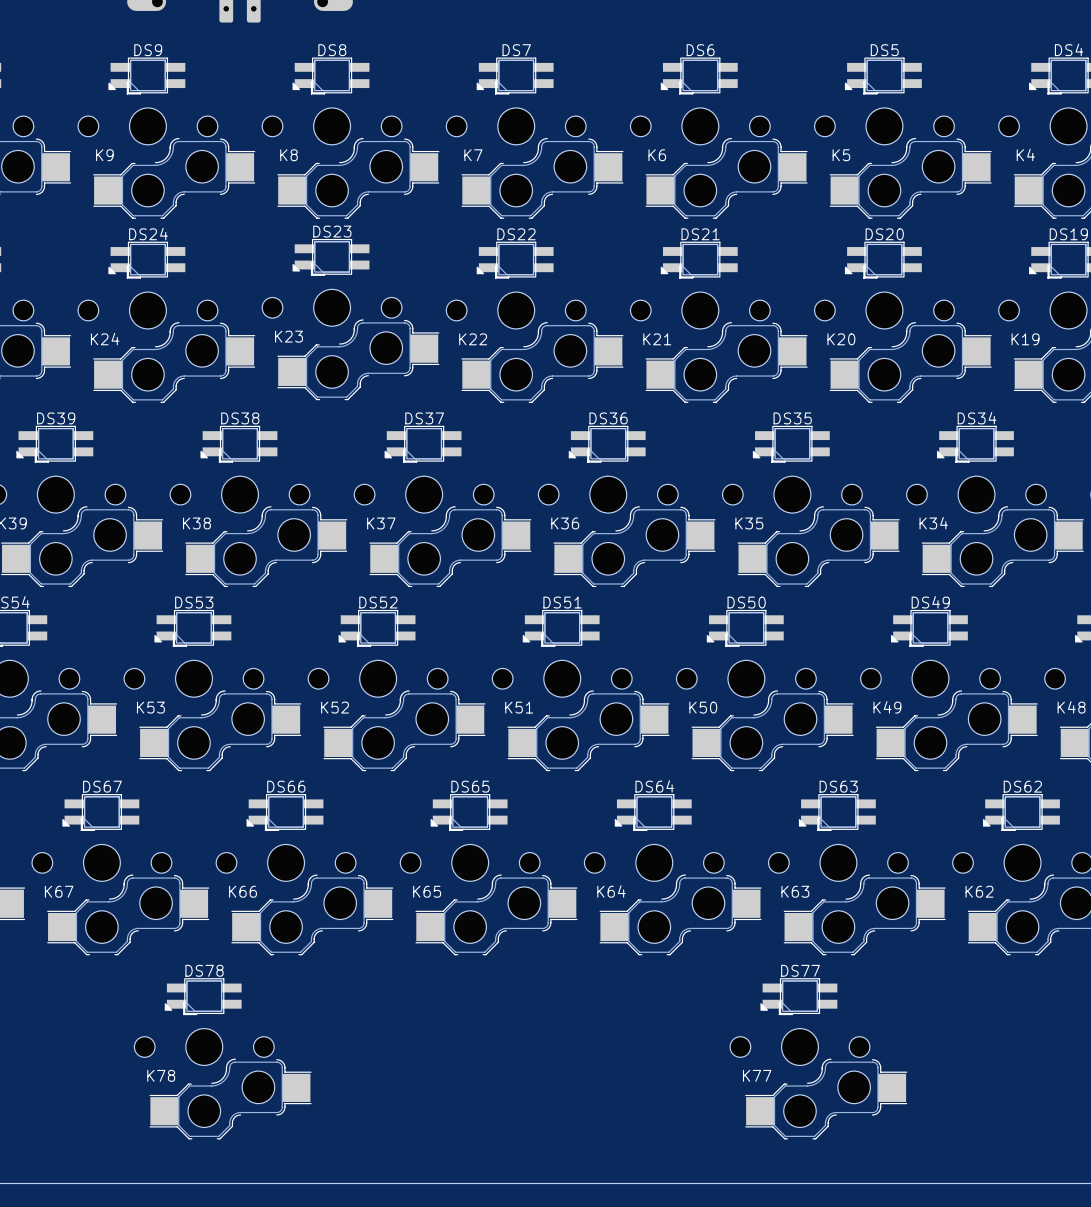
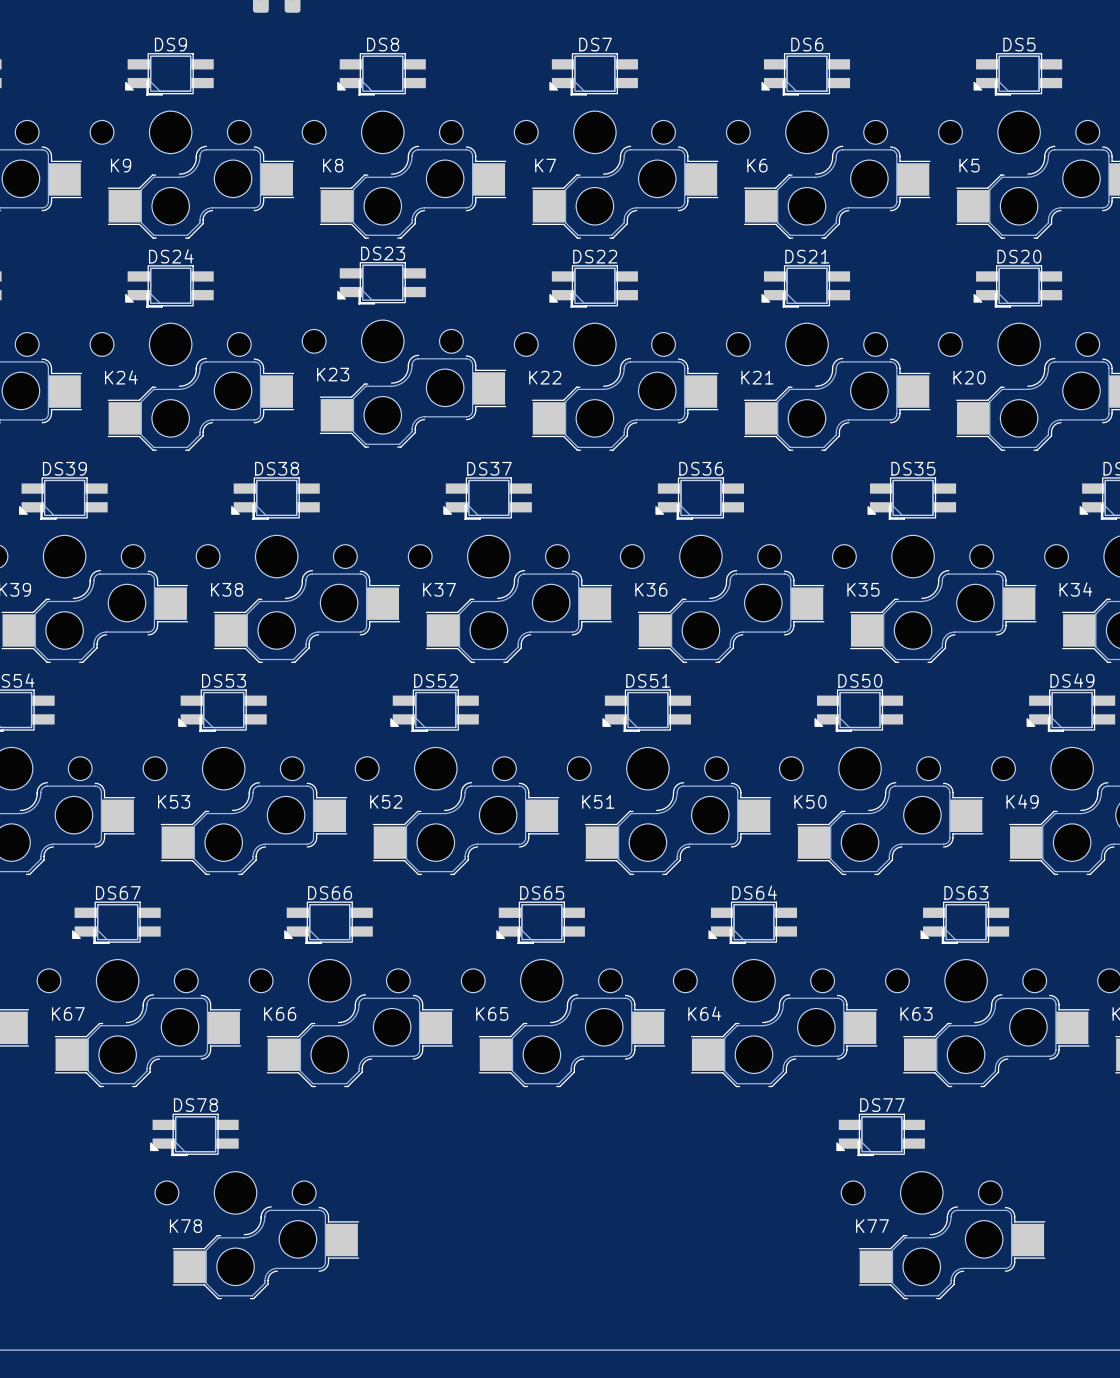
DS78 position: (203, 996) -> (194, 1134)
DS77 position: (798, 996) -> (880, 1134)

